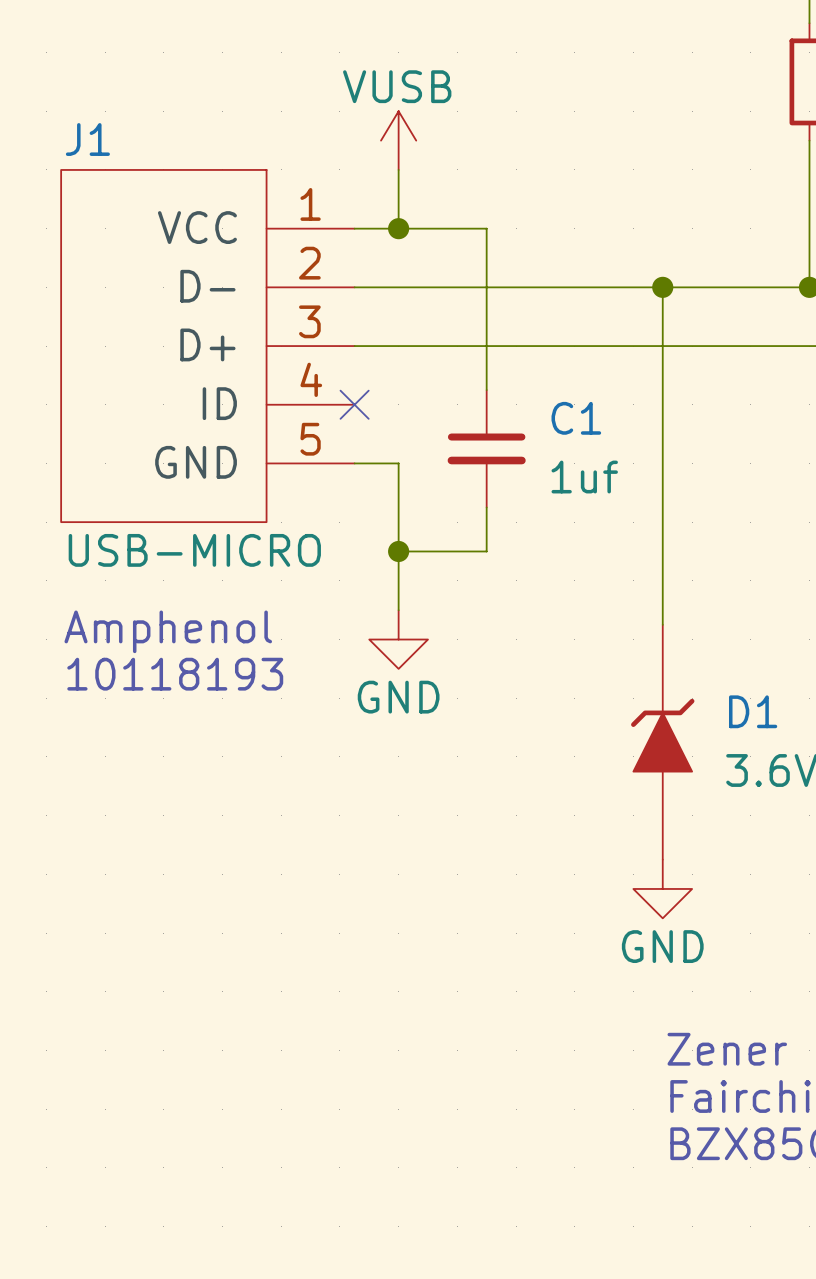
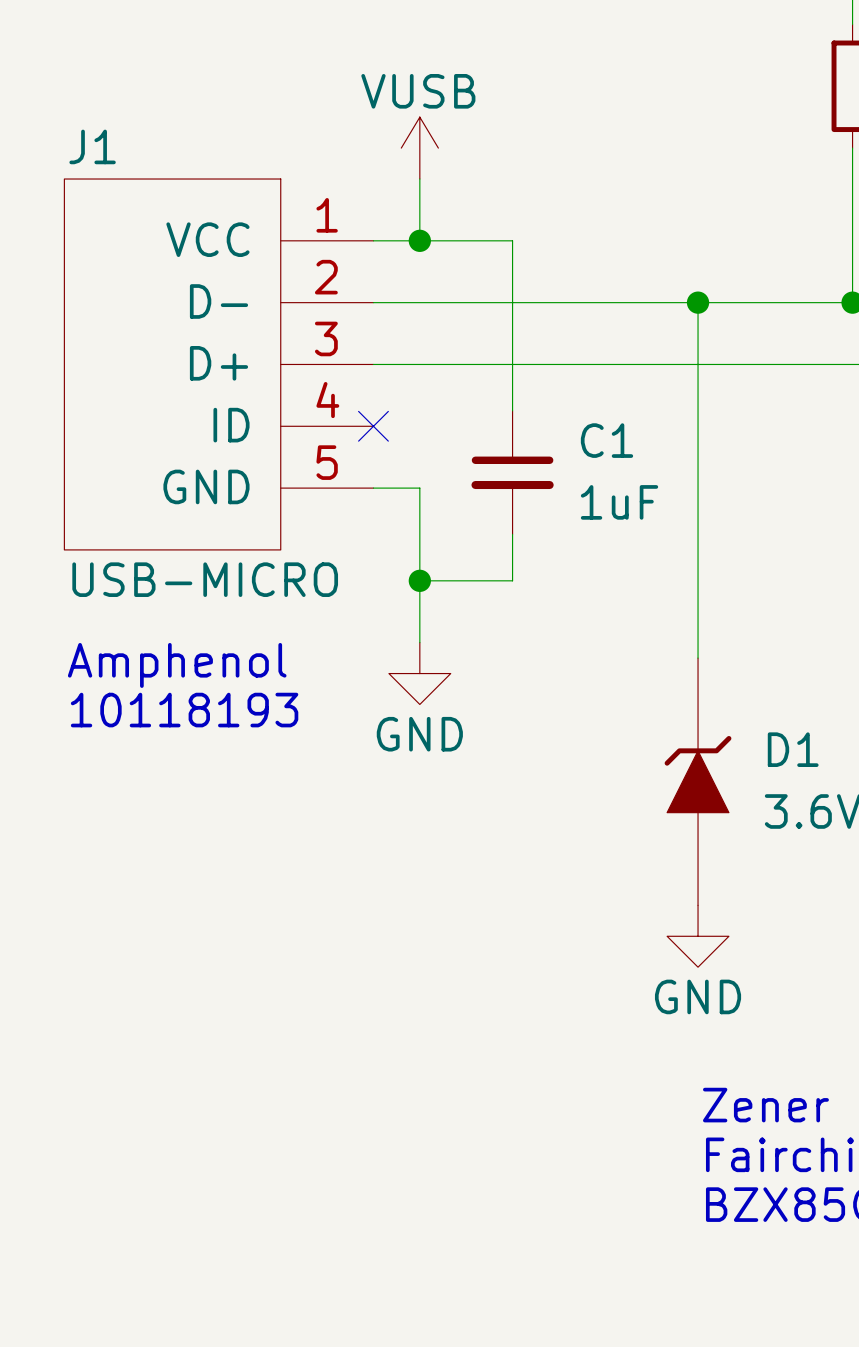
C1 value: 1uf (584, 477) -> 1uF (619, 502)

